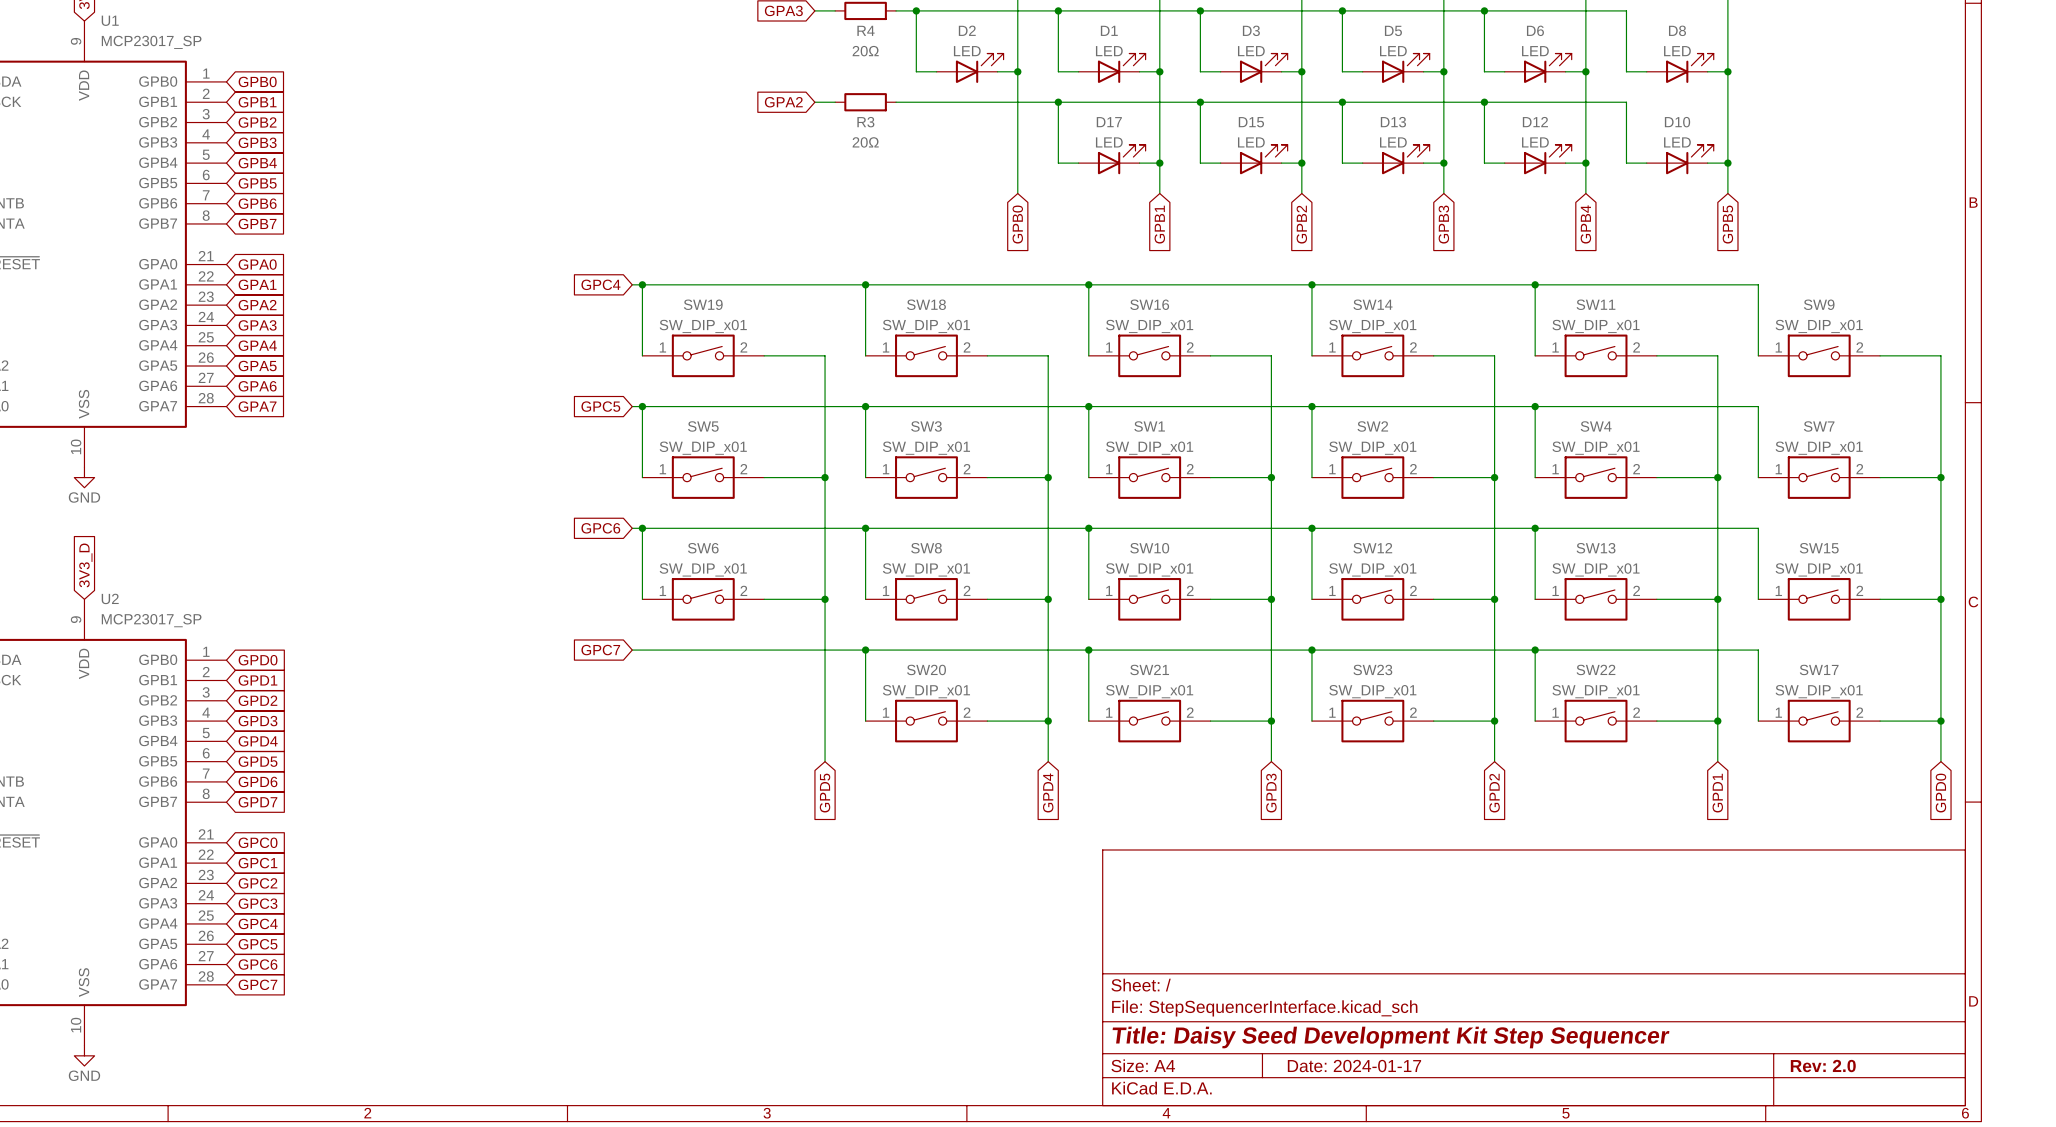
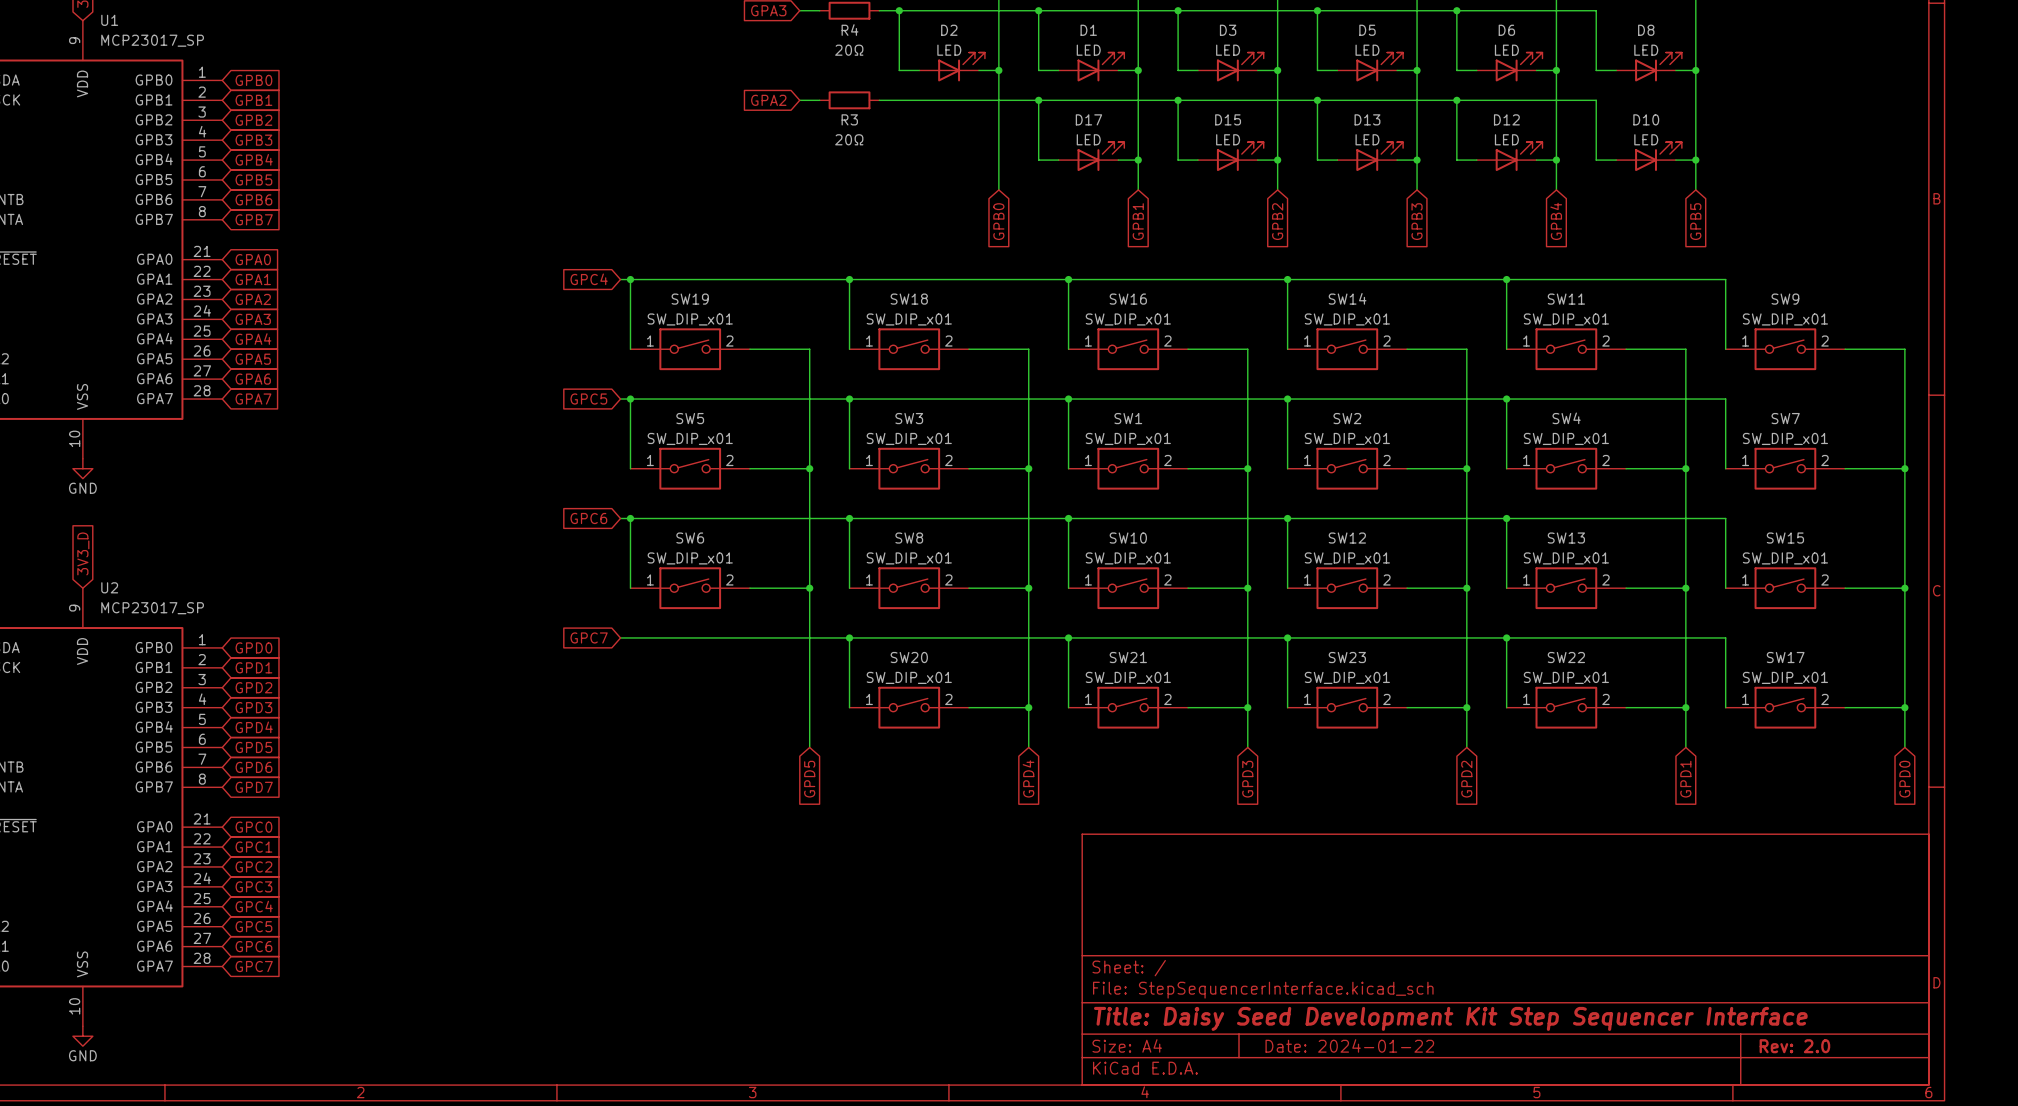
title block: Title: Daisy Seed Development Kit Step Sequencer (1390, 1037) -> Title: Daisy Seed Development Kit Step Sequencer Interface (1450, 1018)
title block: Date: 2024-01-17 (1354, 1066) -> Date: 2024-01-22 (1349, 1045)

